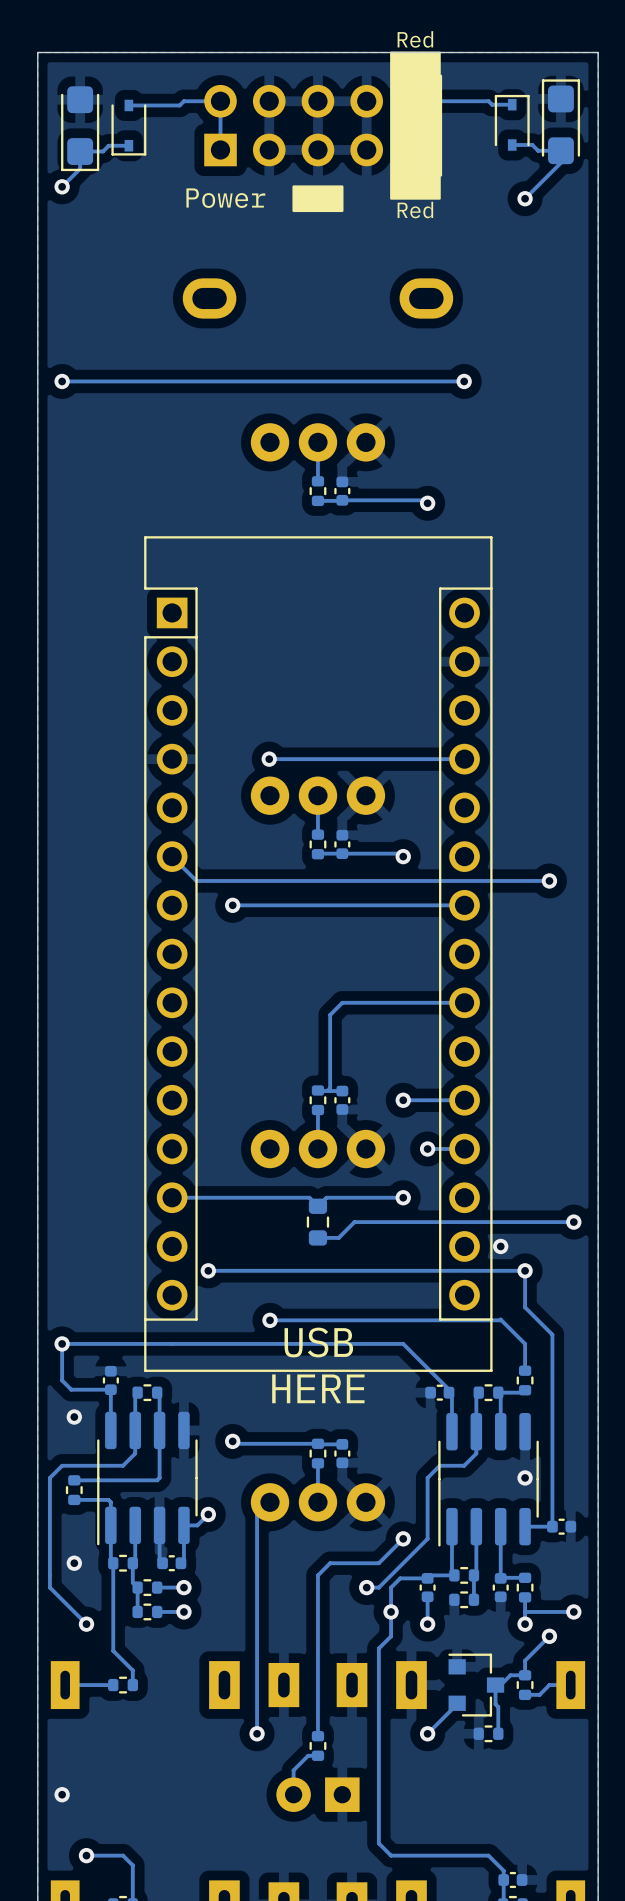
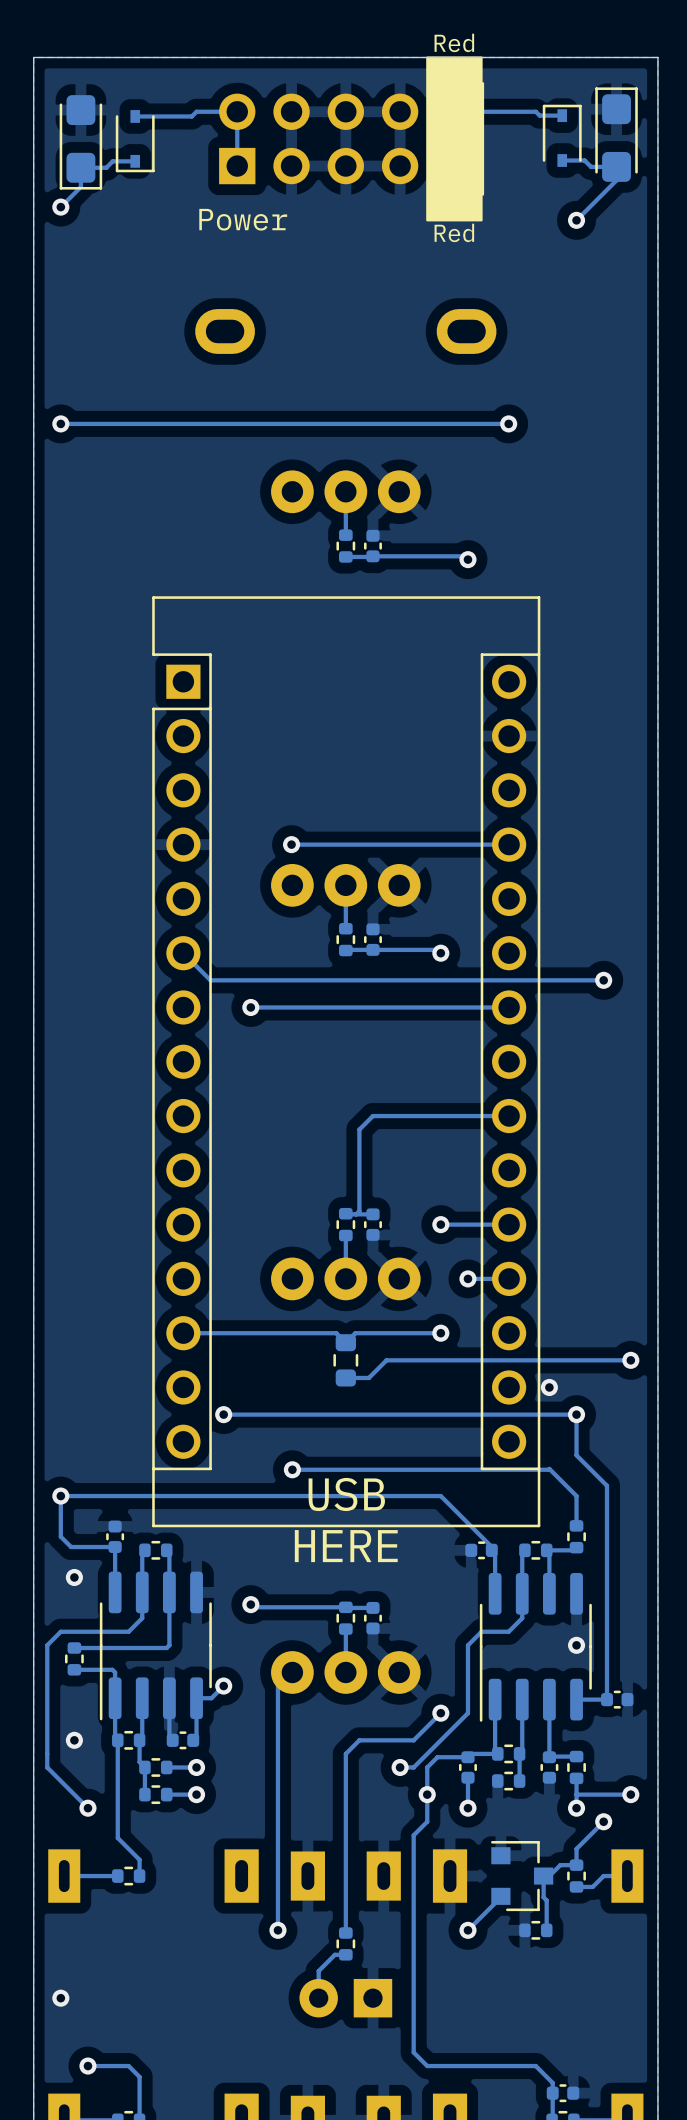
drawing: [292, 185, 344, 213] -> none

